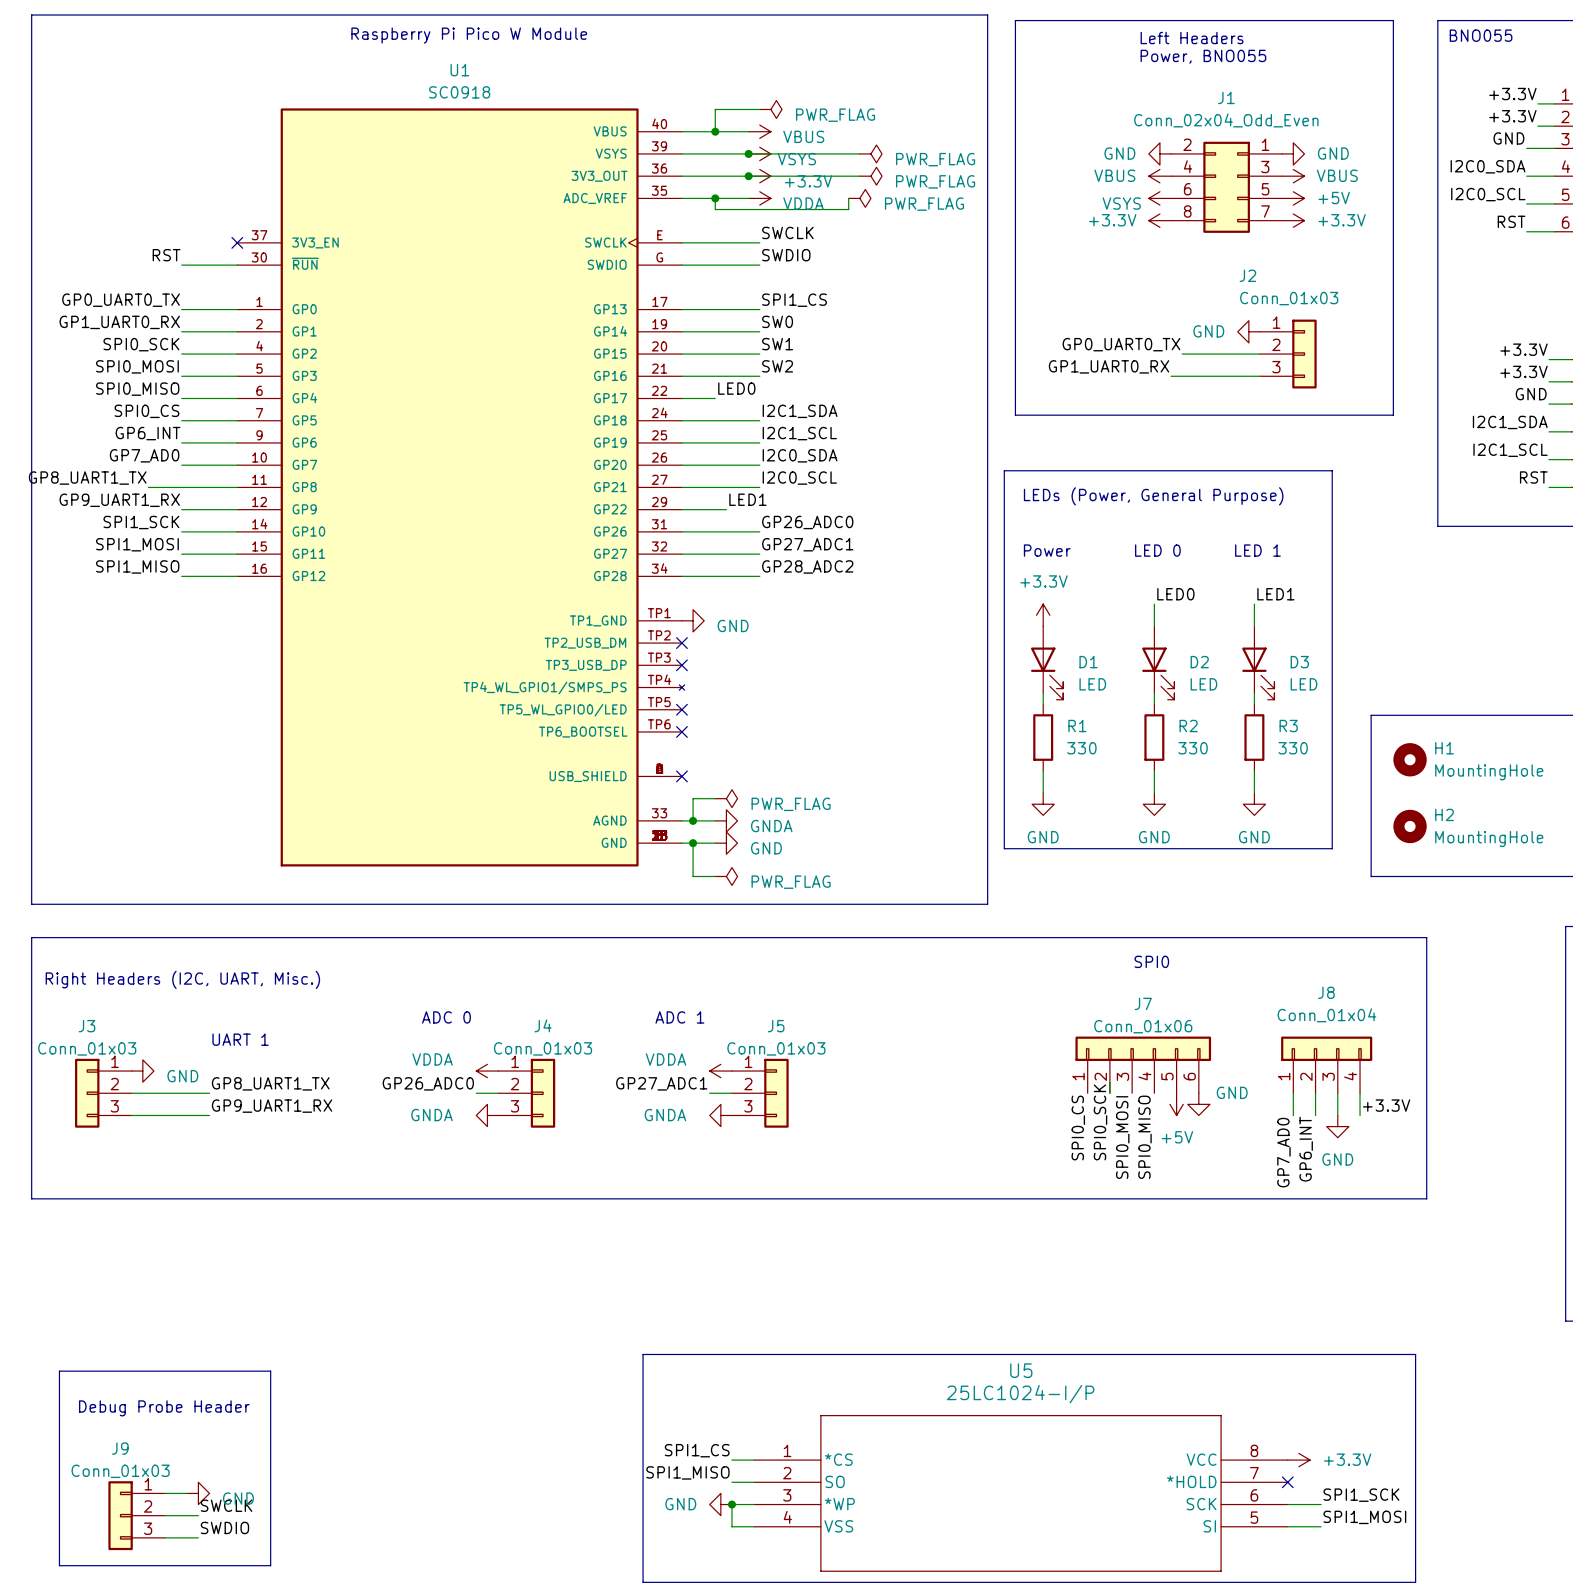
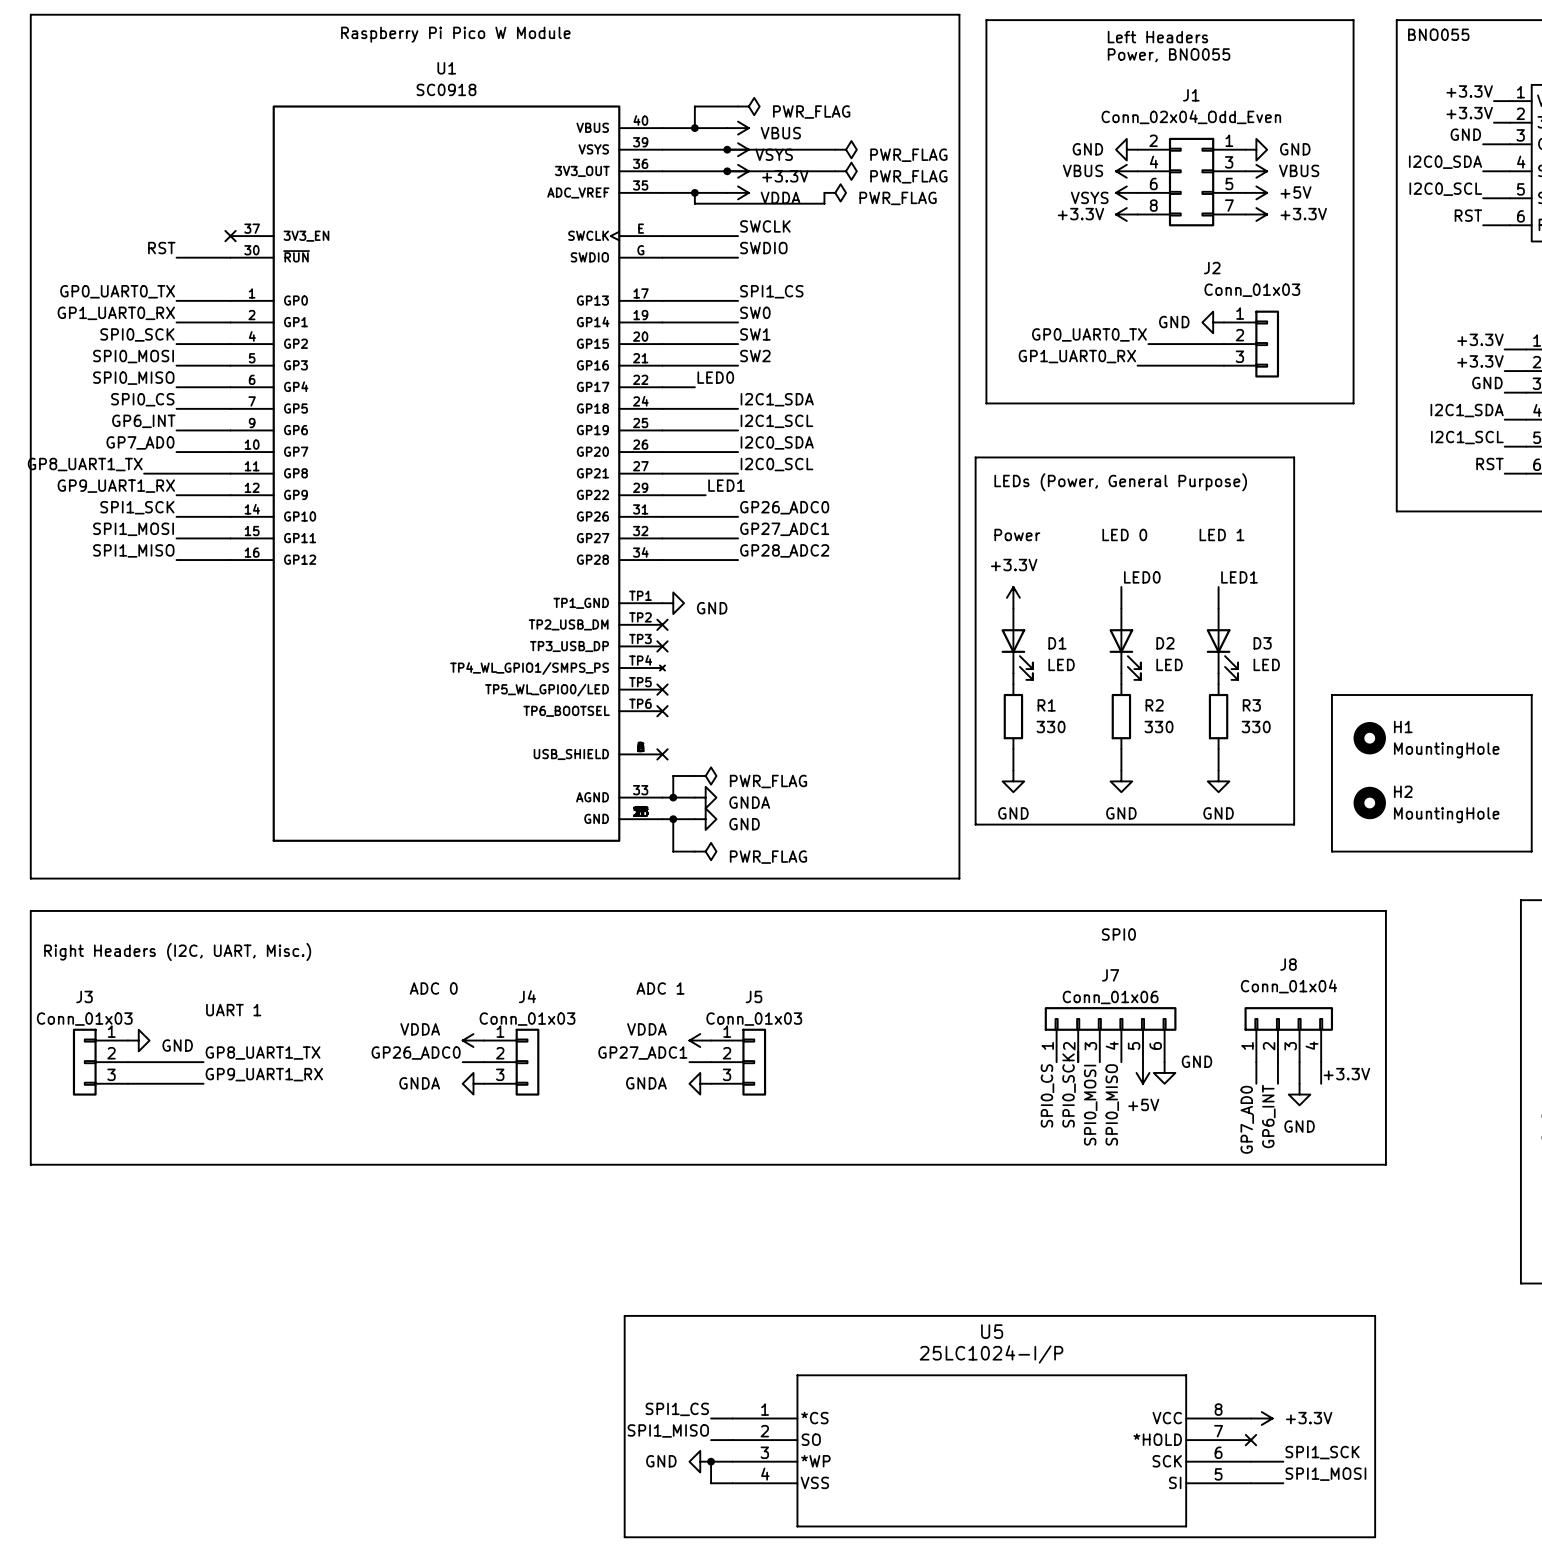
line: (59, 1371) (270, 1371) (270, 1565) (59, 1565) (59, 1371) -> none
text: Debug Probe Header (164, 1408) -> none
wire: (165, 1493) (187, 1493) -> none
power symbol: GND (198, 1493) -> none
label: SWCLK (226, 1505) -> none
J9: Conn_01x03 (136, 1515) -> none
wire: (165, 1515) (198, 1515) -> none
label: SWDIO (224, 1527) -> none
wire: (165, 1537) (198, 1537) -> none

